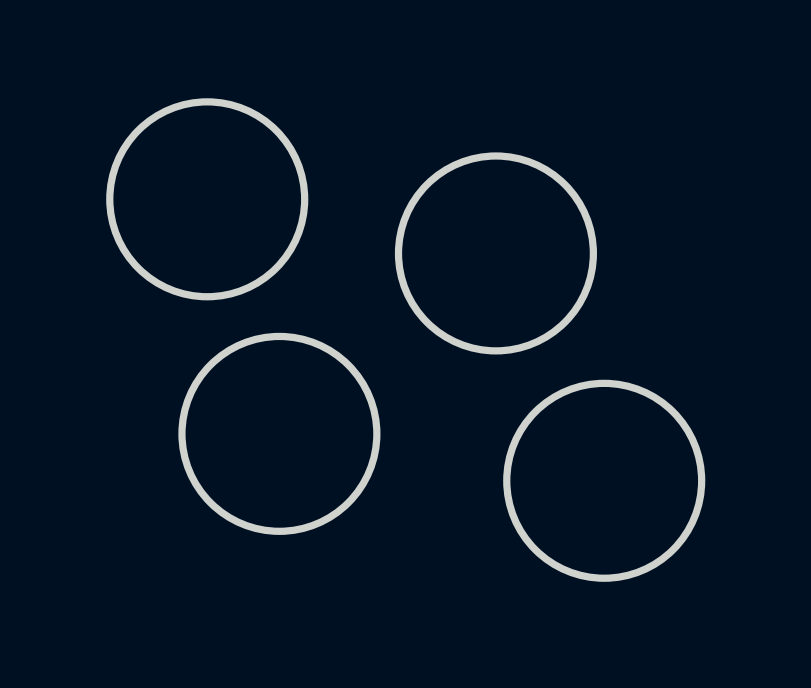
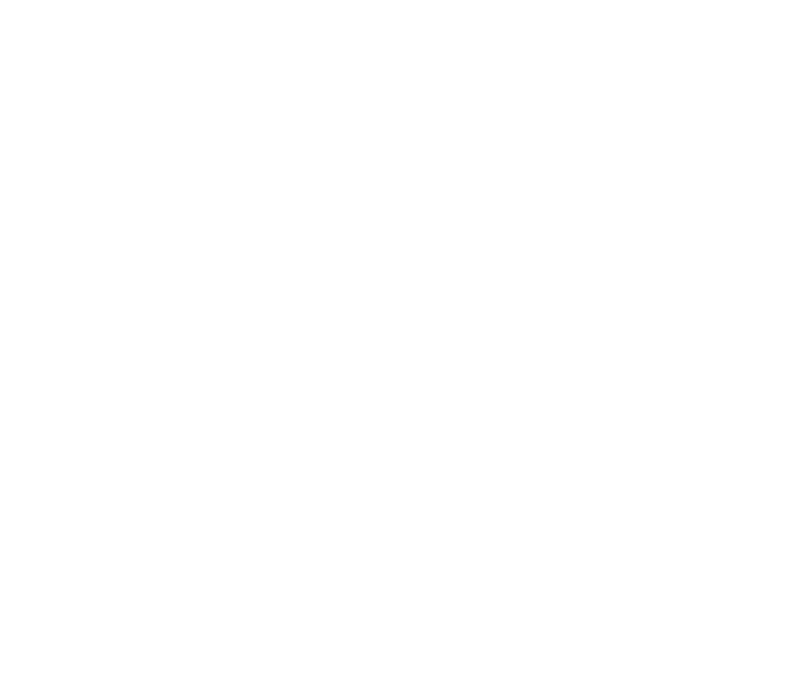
round board edge: [106, 98, 309, 301] -> none
round board edge: [394, 152, 597, 355] -> none
round board edge: [178, 332, 381, 535] -> none
round board edge: [503, 379, 706, 582] -> none

